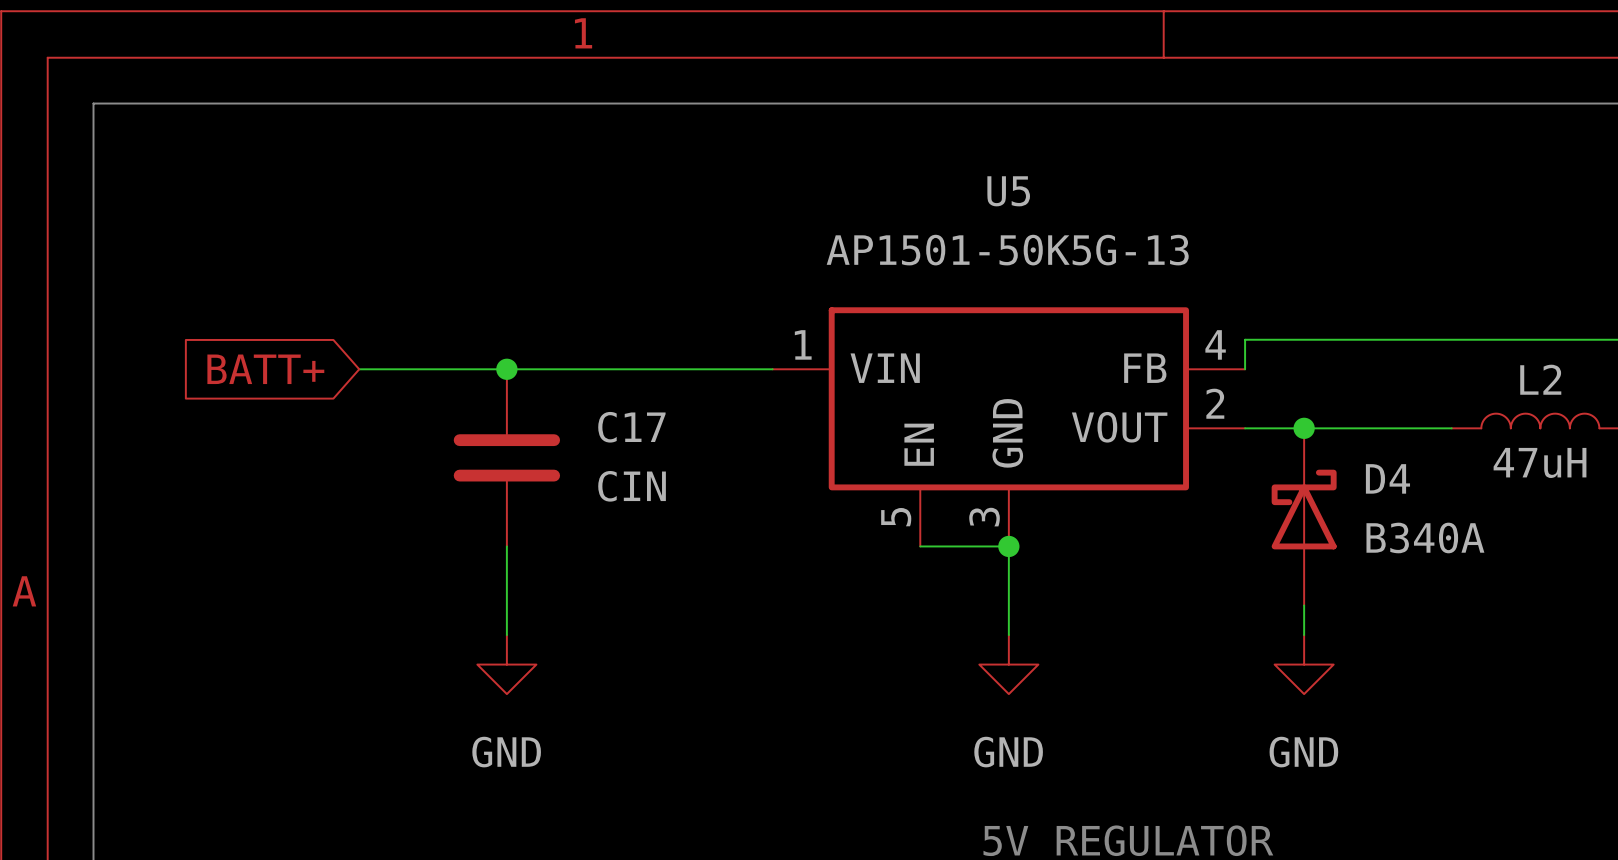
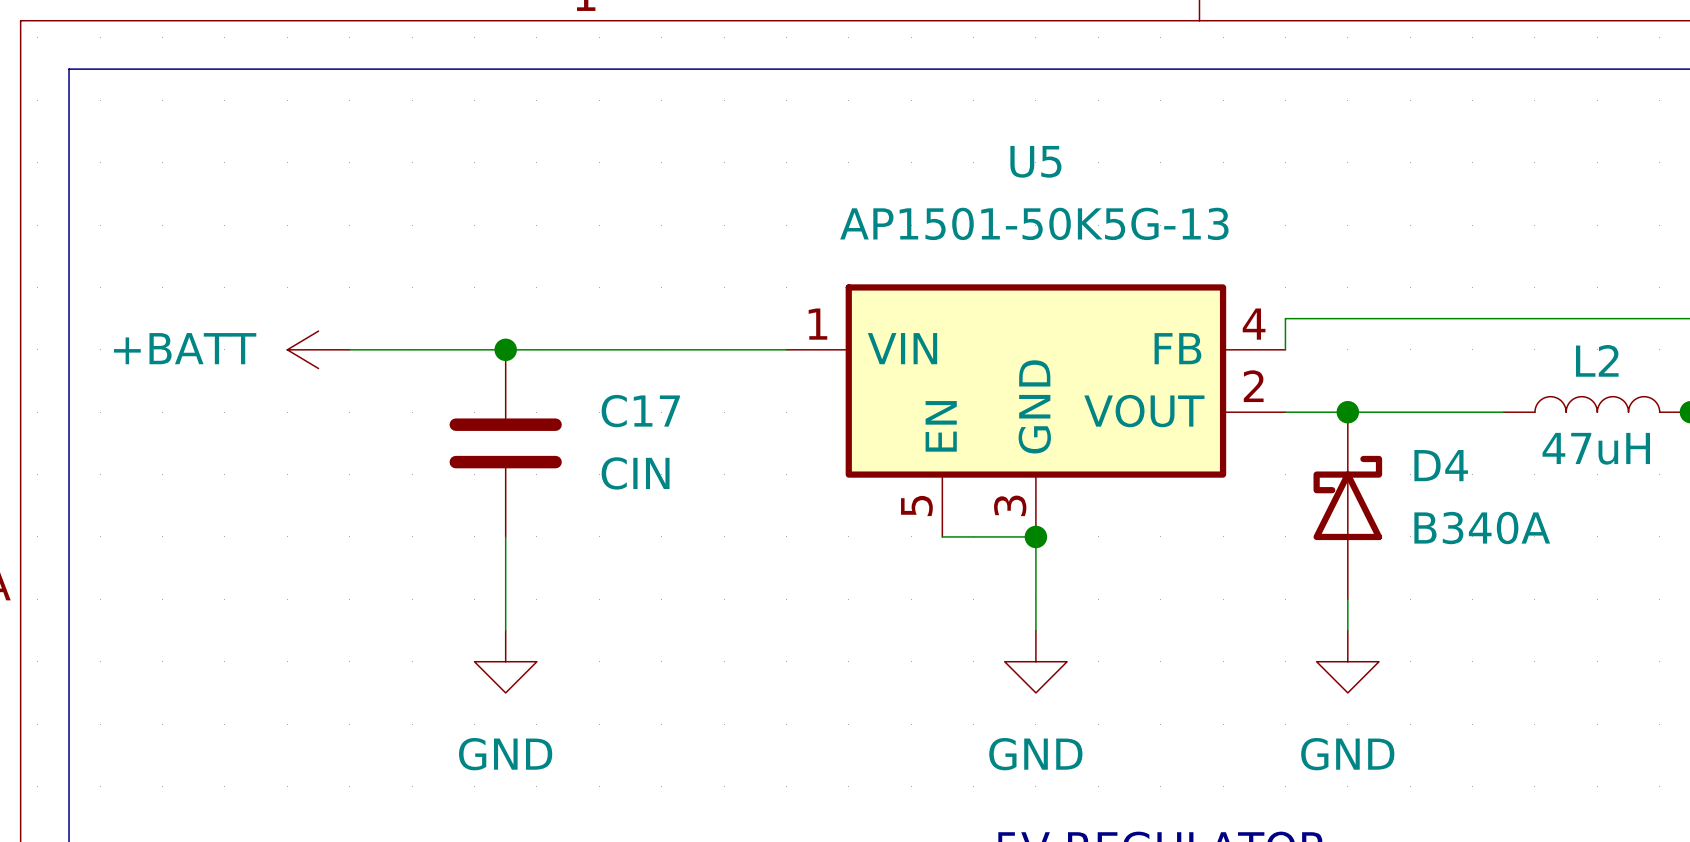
global label: BATT+ (265, 369) -> none
power symbol: none -> +BATT (318, 349)

